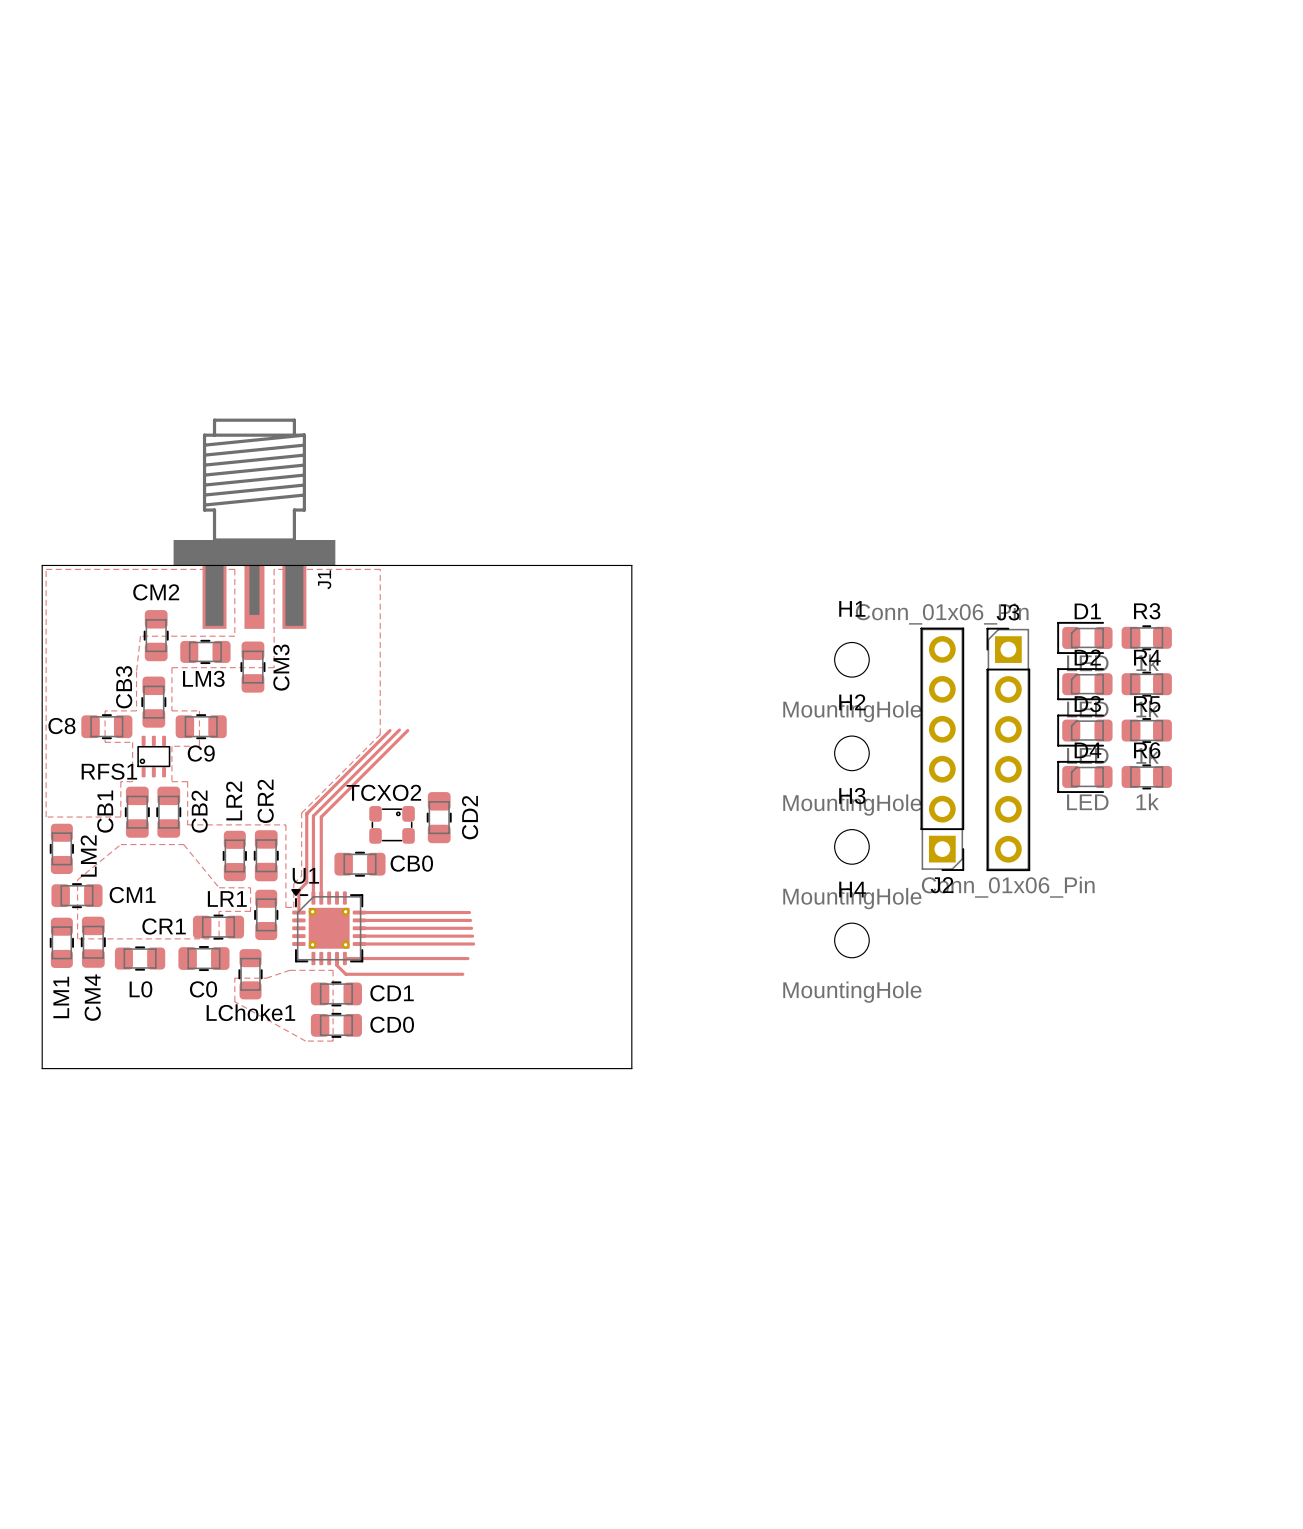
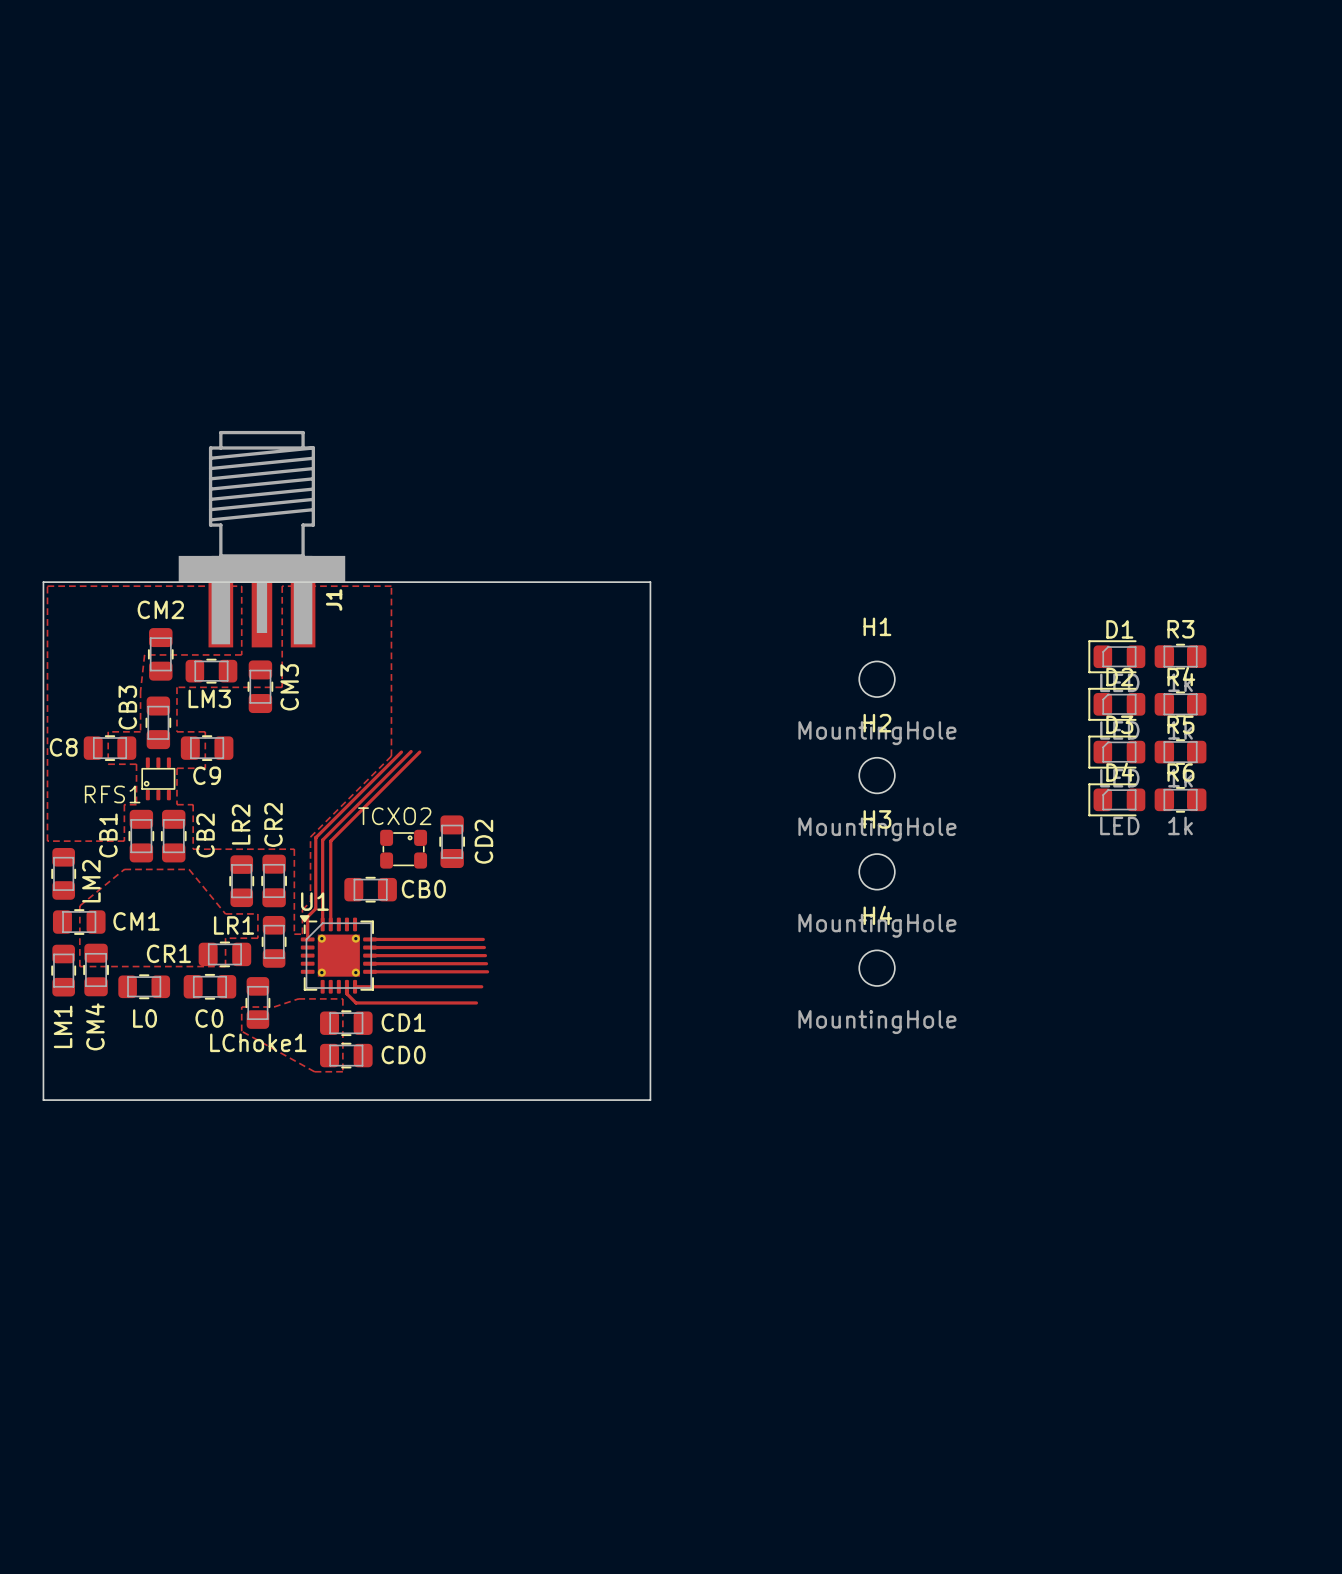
J2: Conn_01x06_Pin (942, 749) -> none
J3: Conn_01x06_Pin (1008, 749) -> none

